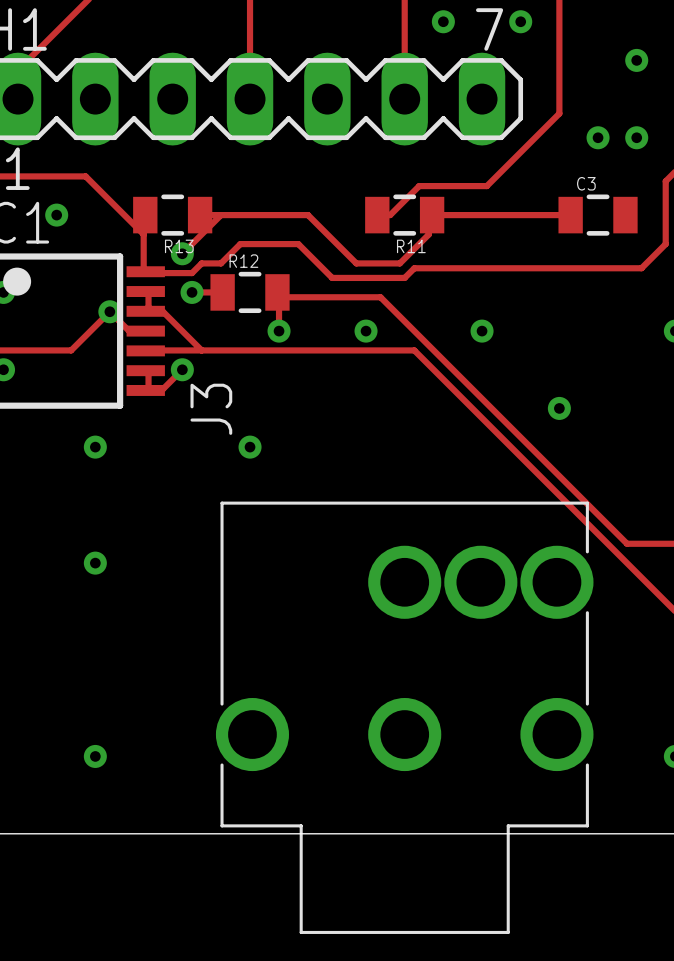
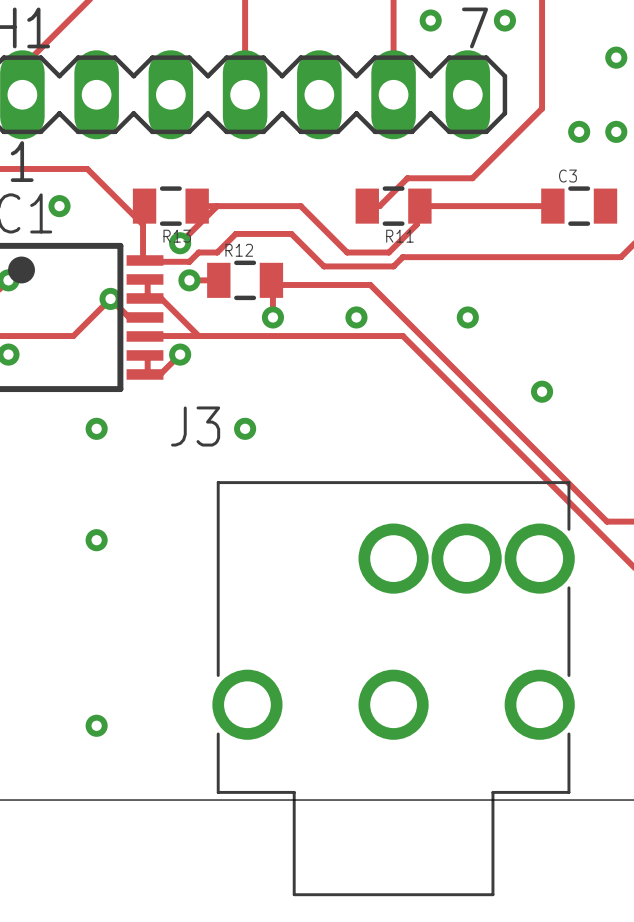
J3 name rotation: 0° (211, 409) -> 90° clockwise (195, 426)

